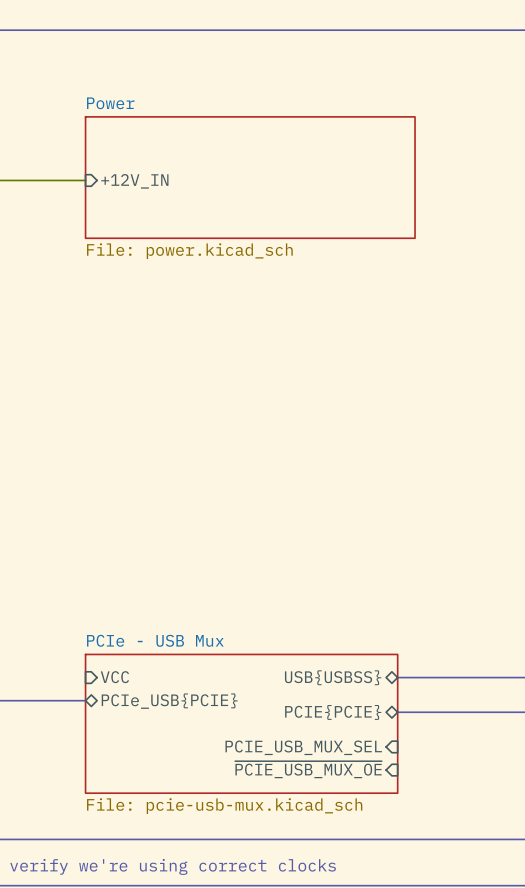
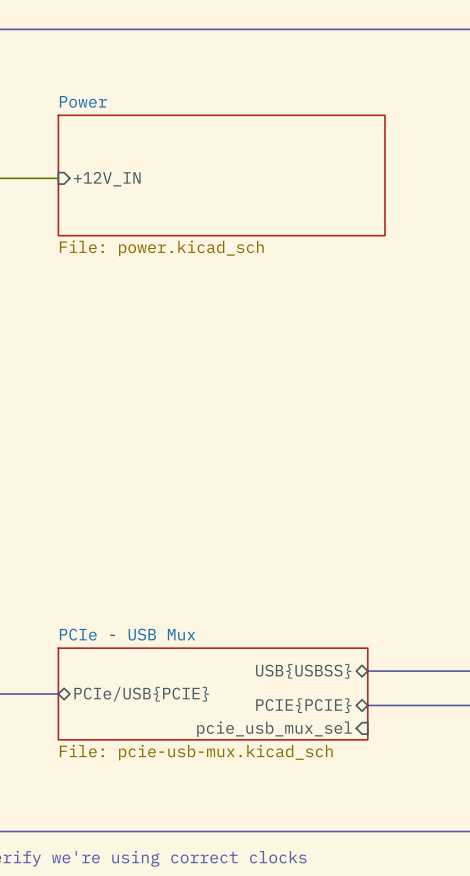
sheet pin: VCC (114, 677) -> none
sheet PCIe - USB Mux: none -> File: pcie-usb-mux.kicad_sch (213, 694)
sheet pin: PCIe_USB{PCIE} (169, 701) -> PCIe/USB{PCIE} (141, 694)
sheet PCIe - USB Mux: File: pcie-usb-mux.kicad_sch (241, 723) -> none
sheet pin: none -> pcie_usb_mux_sel (274, 729)
sheet pin: PCIE_USB_MUX_SEL (303, 747) -> none
sheet pin: ~{PCIE_USB_MUX_OE} (308, 769) -> none

